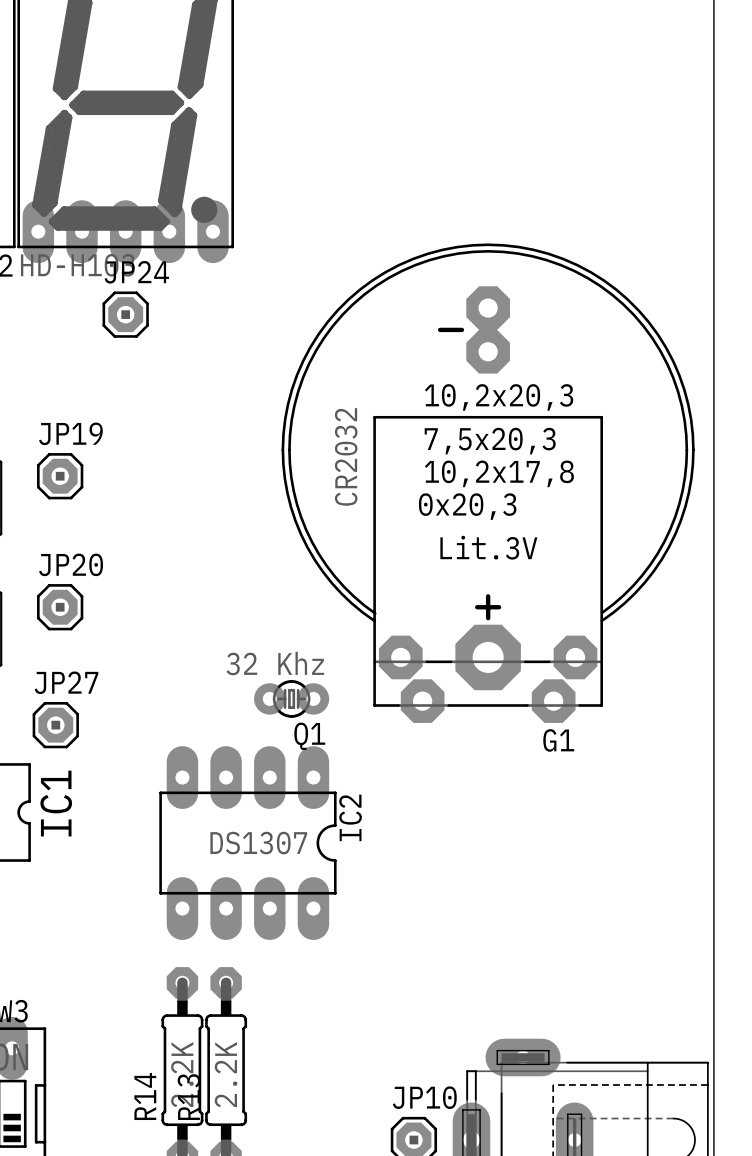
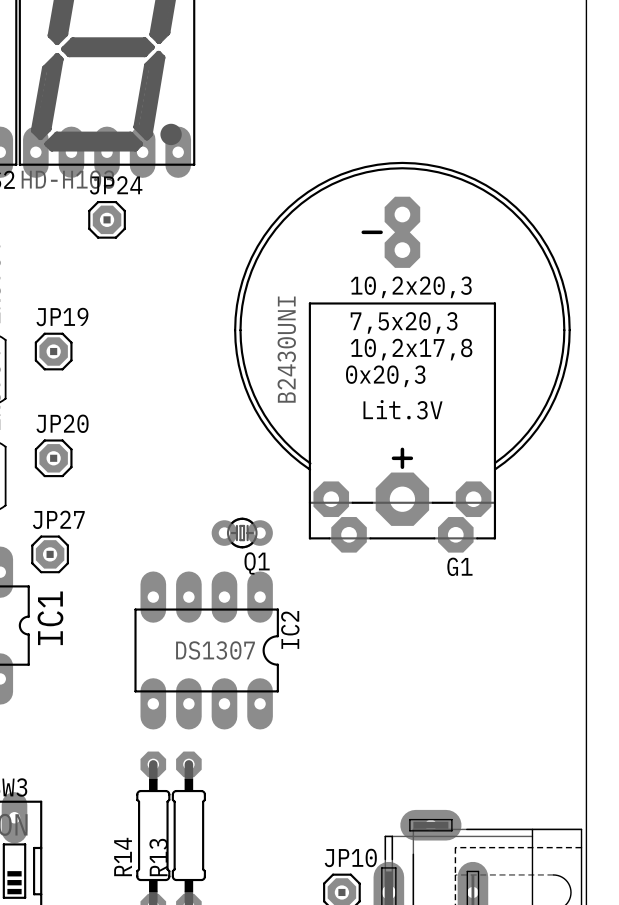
G1 value: CR2032 (346, 456) -> B2430UNI (286, 349)
Q1 value: 32 Khz (275, 663) -> none
R14 value: 2.2K (182, 1074) -> none
R13 value: 2.2K (226, 1074) -> none

